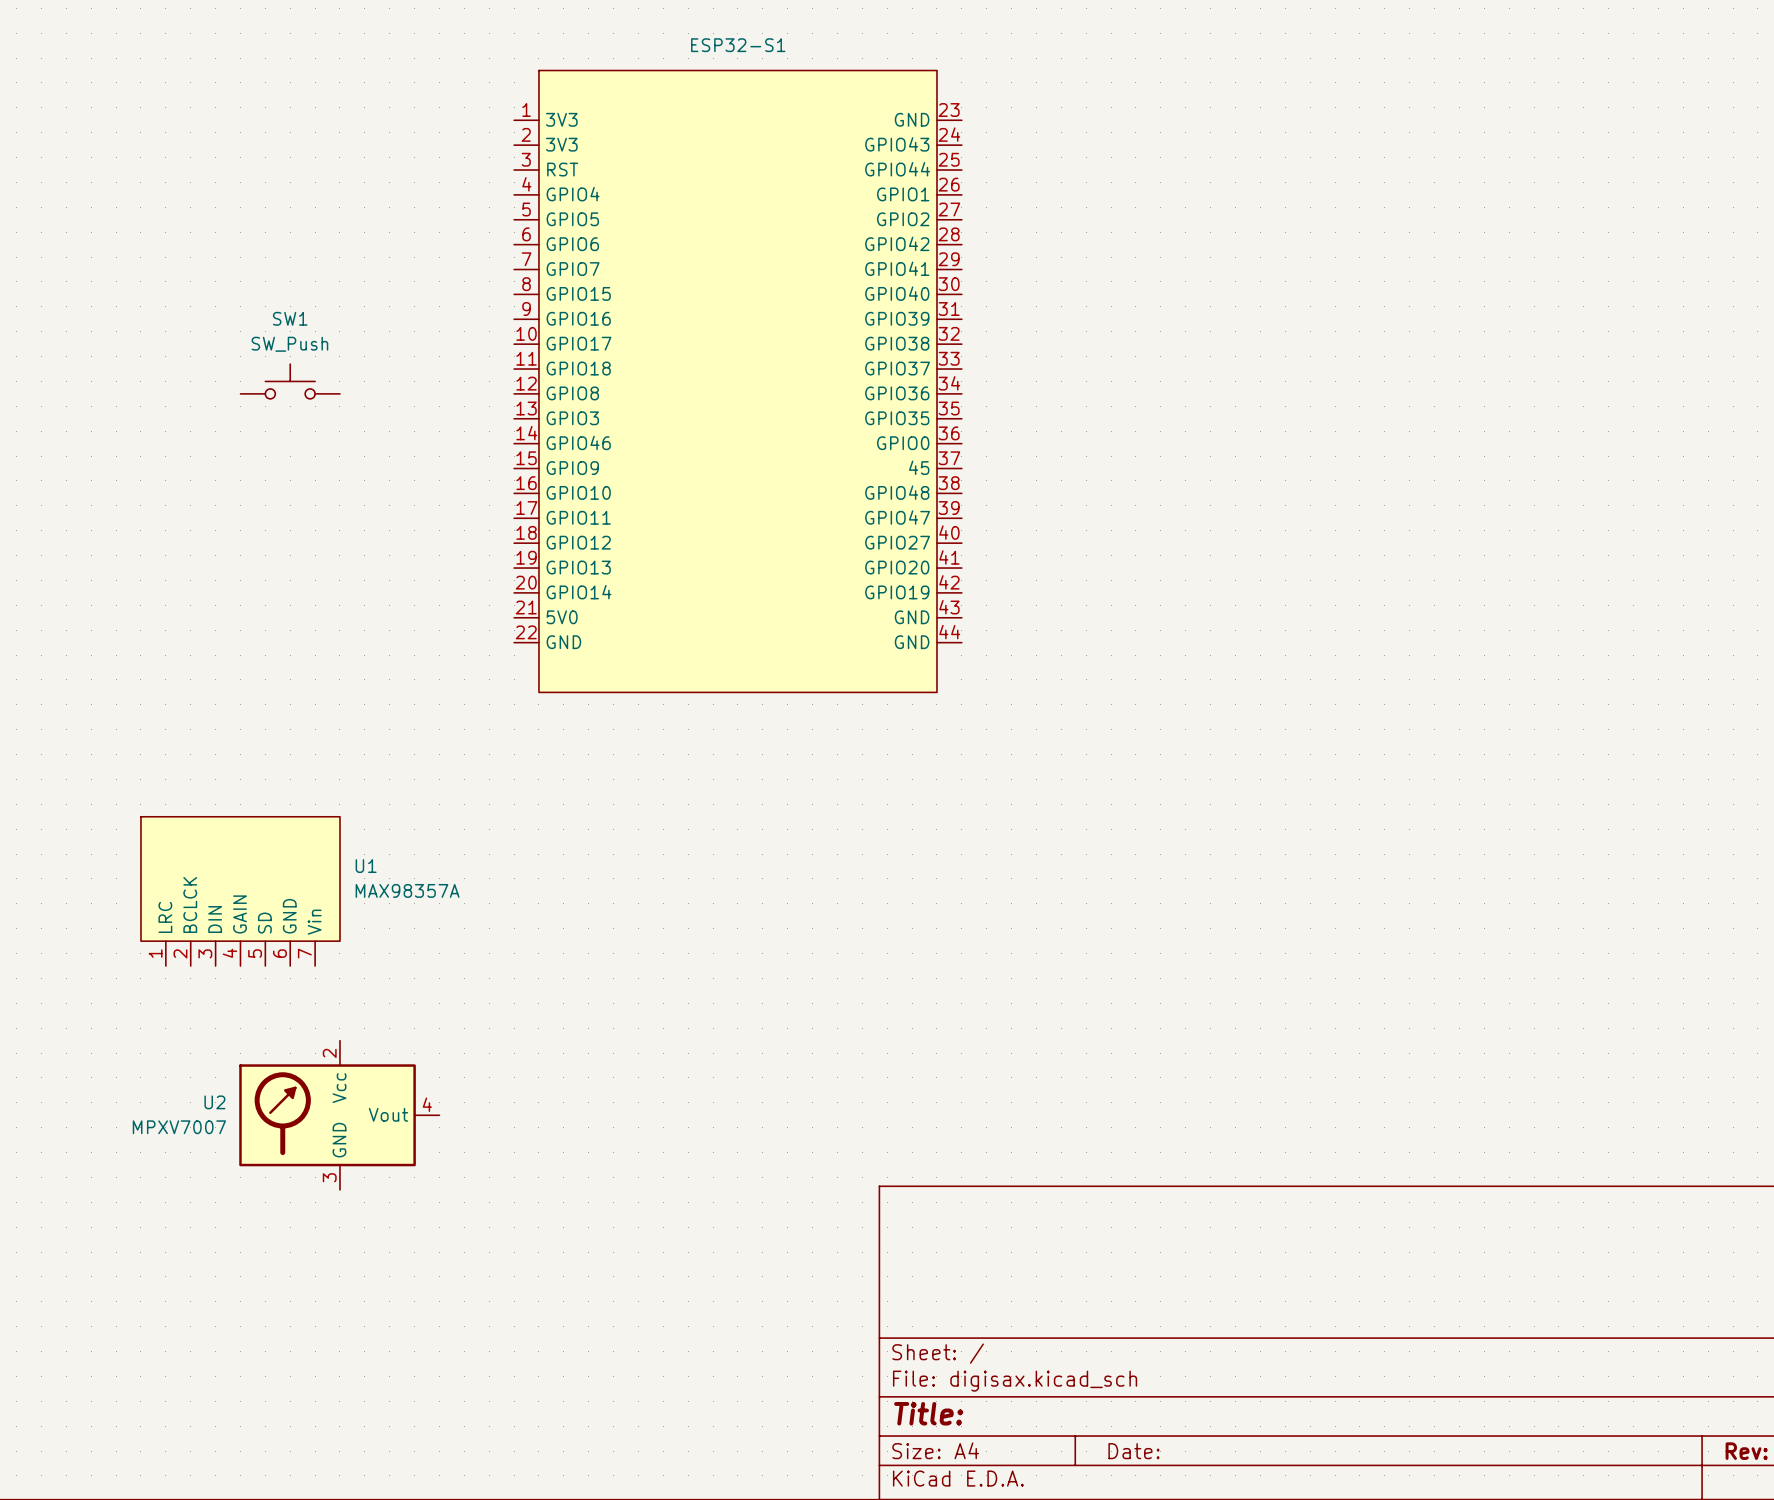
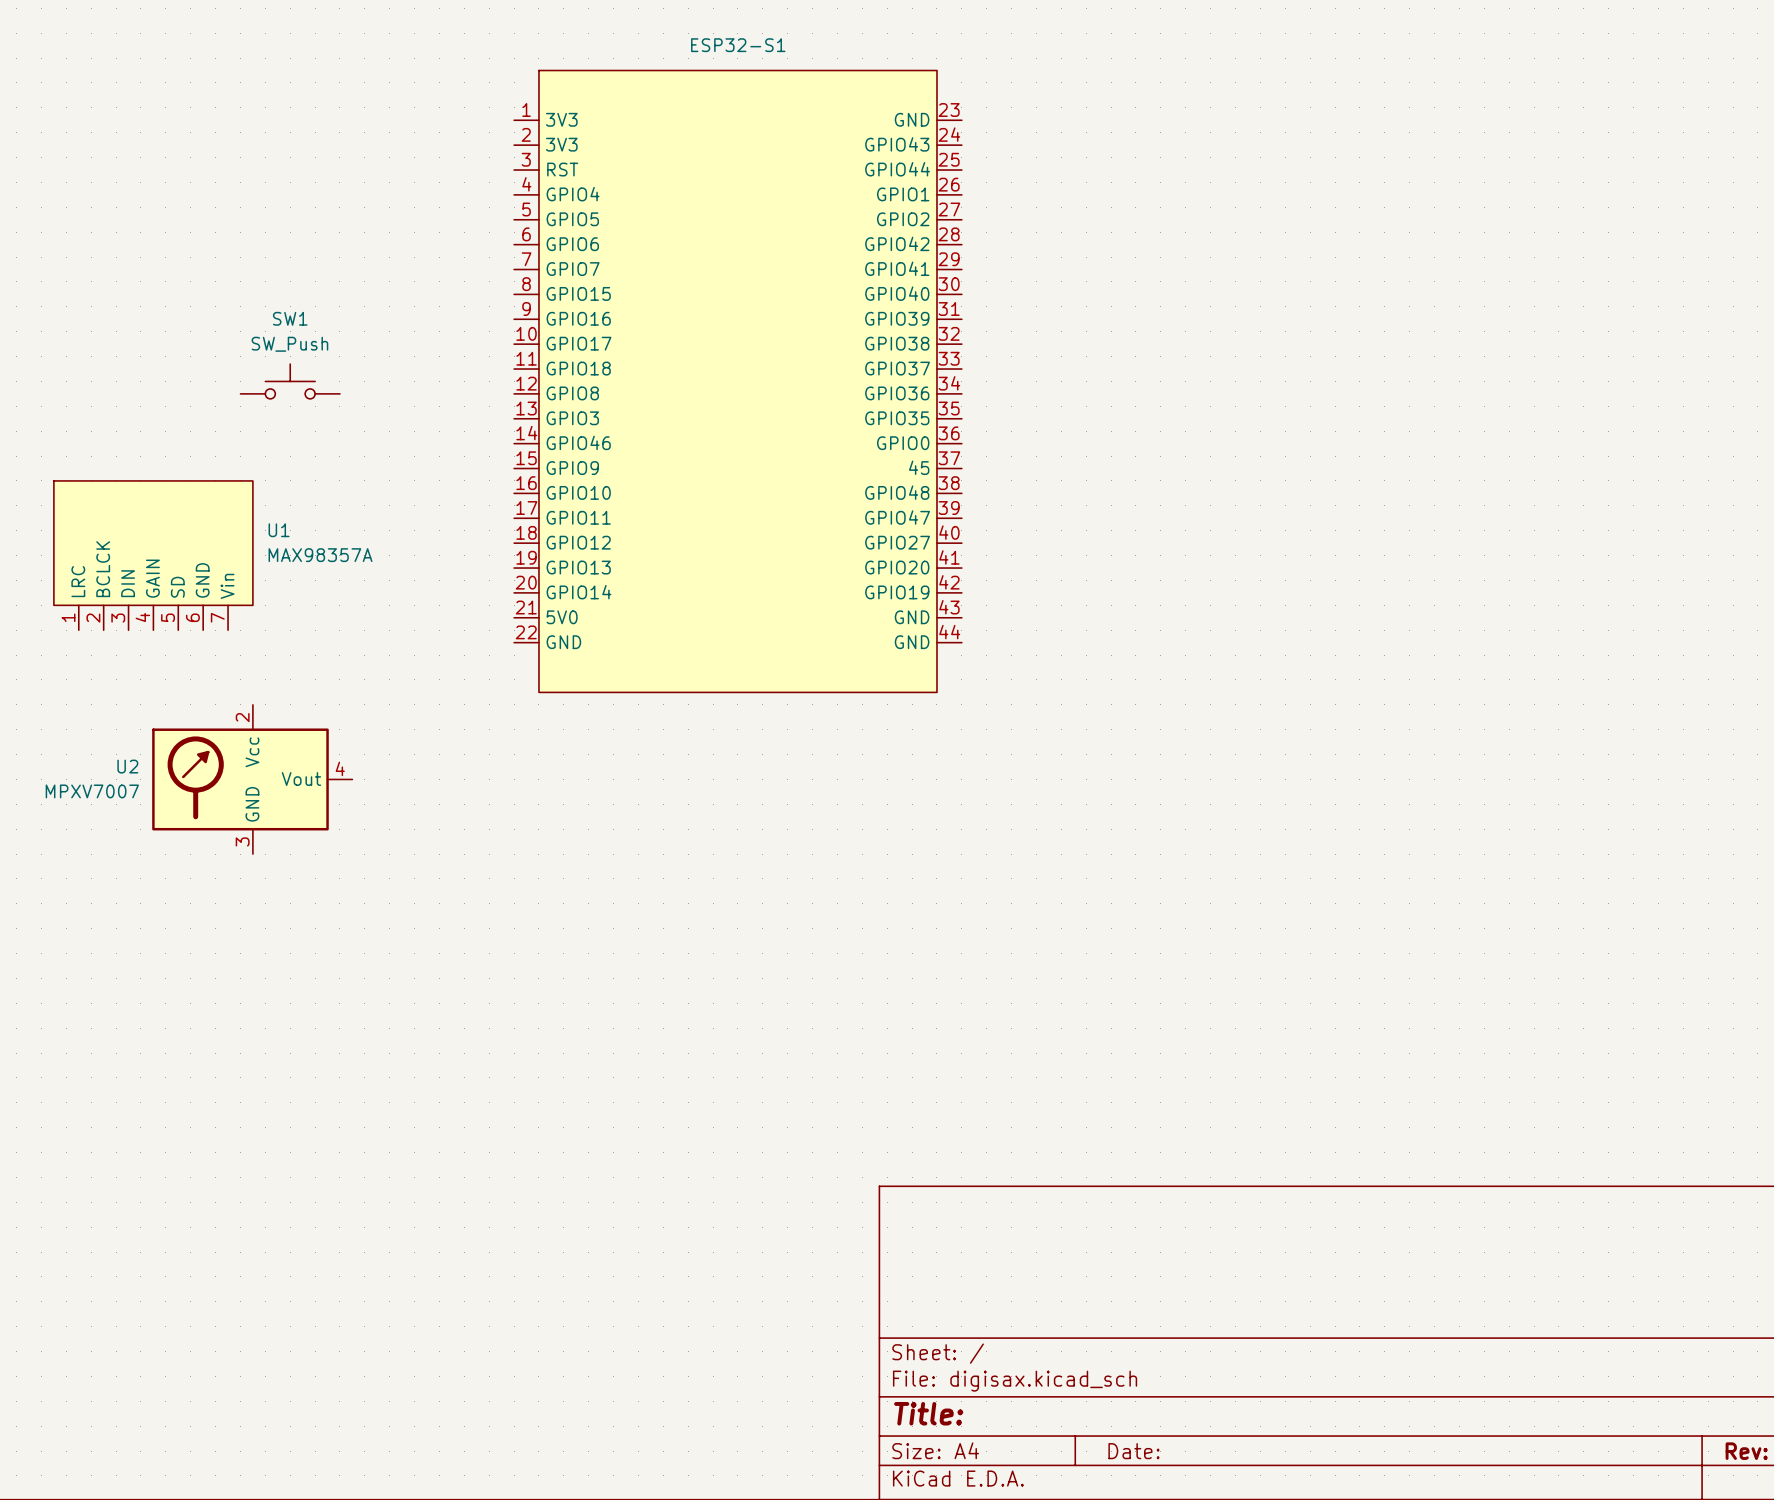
U1 position: (240, 891) -> (153, 555)
U2 position: (339, 1115) -> (252, 779)

